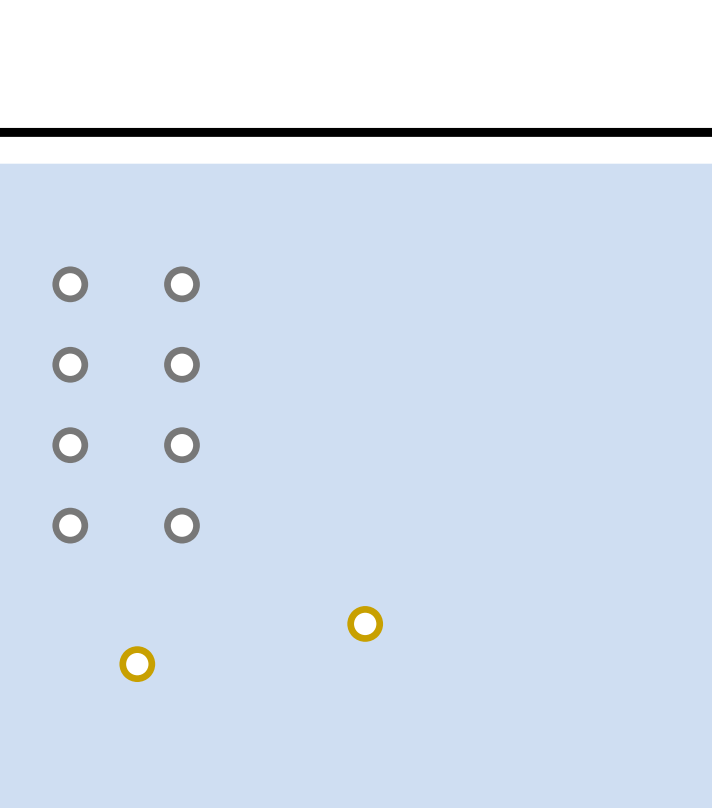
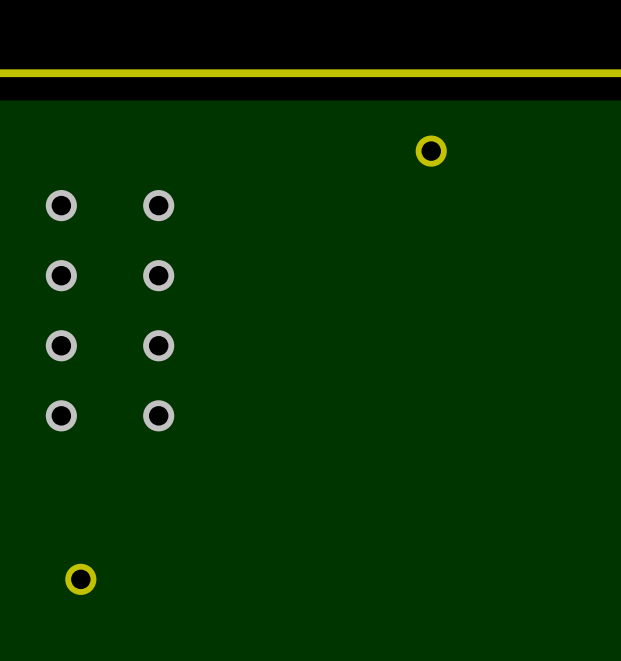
part: none -> (431, 151)
part: (365, 623) -> none
part position: (137, 664) -> (80, 579)

